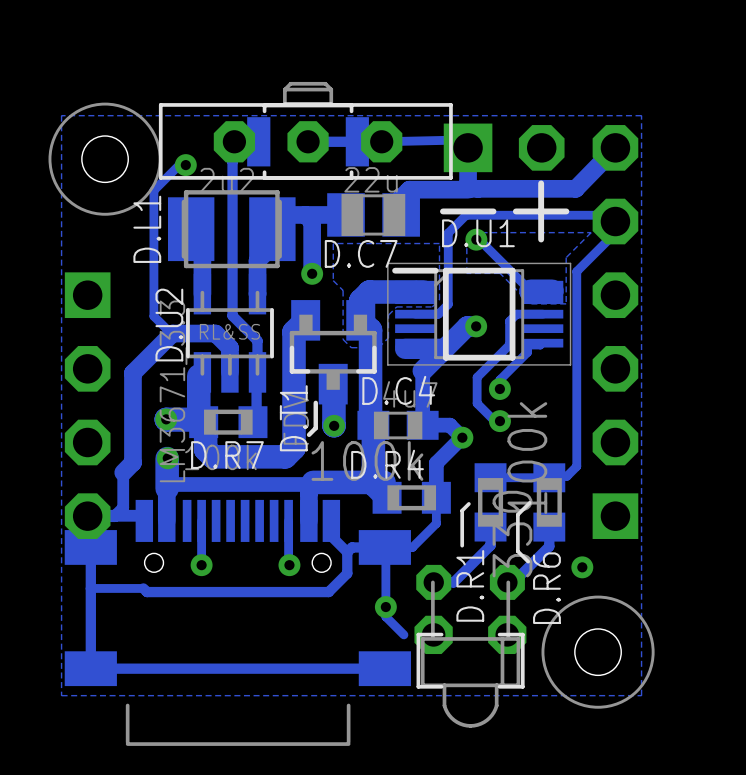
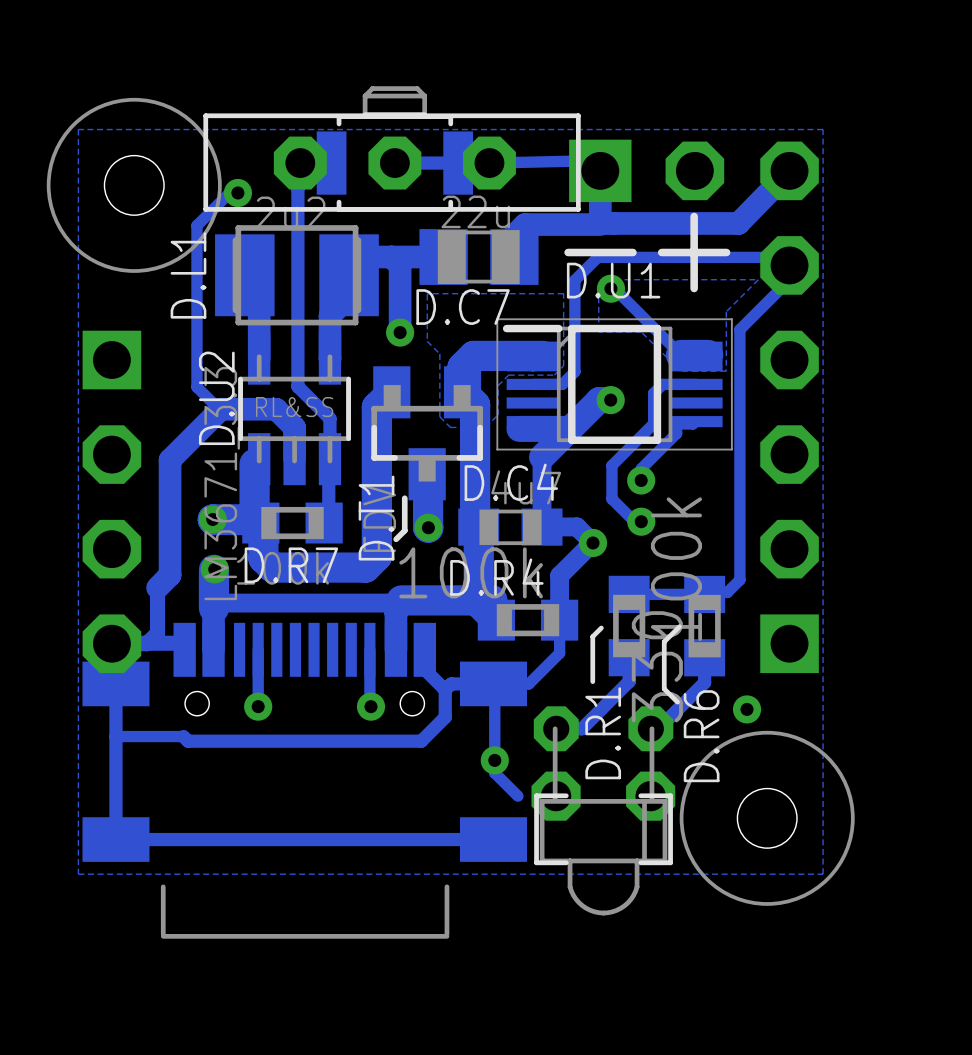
drawing shape: [48, 102, 162, 216] -> [46, 97, 222, 273]
drawing shape: [541, 595, 655, 709] -> [679, 730, 855, 906]

